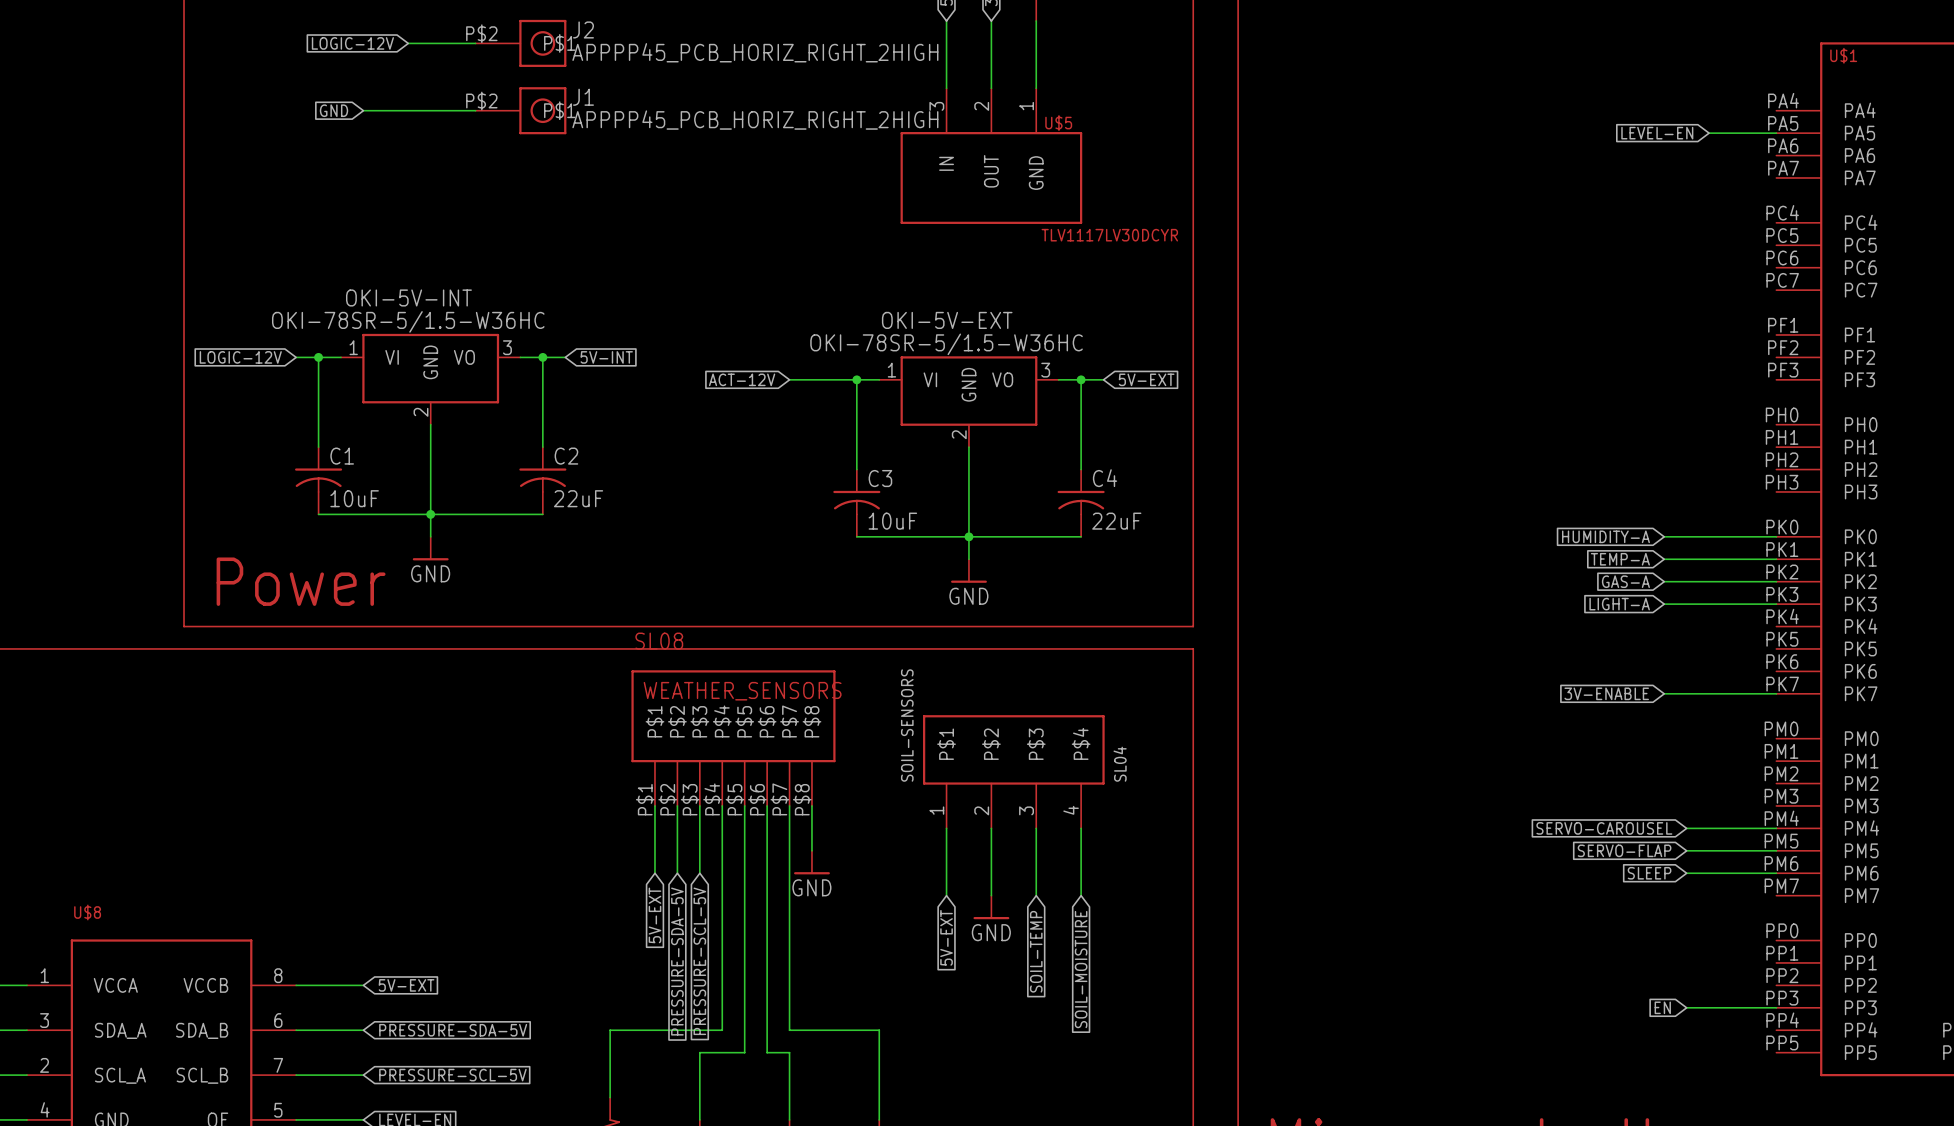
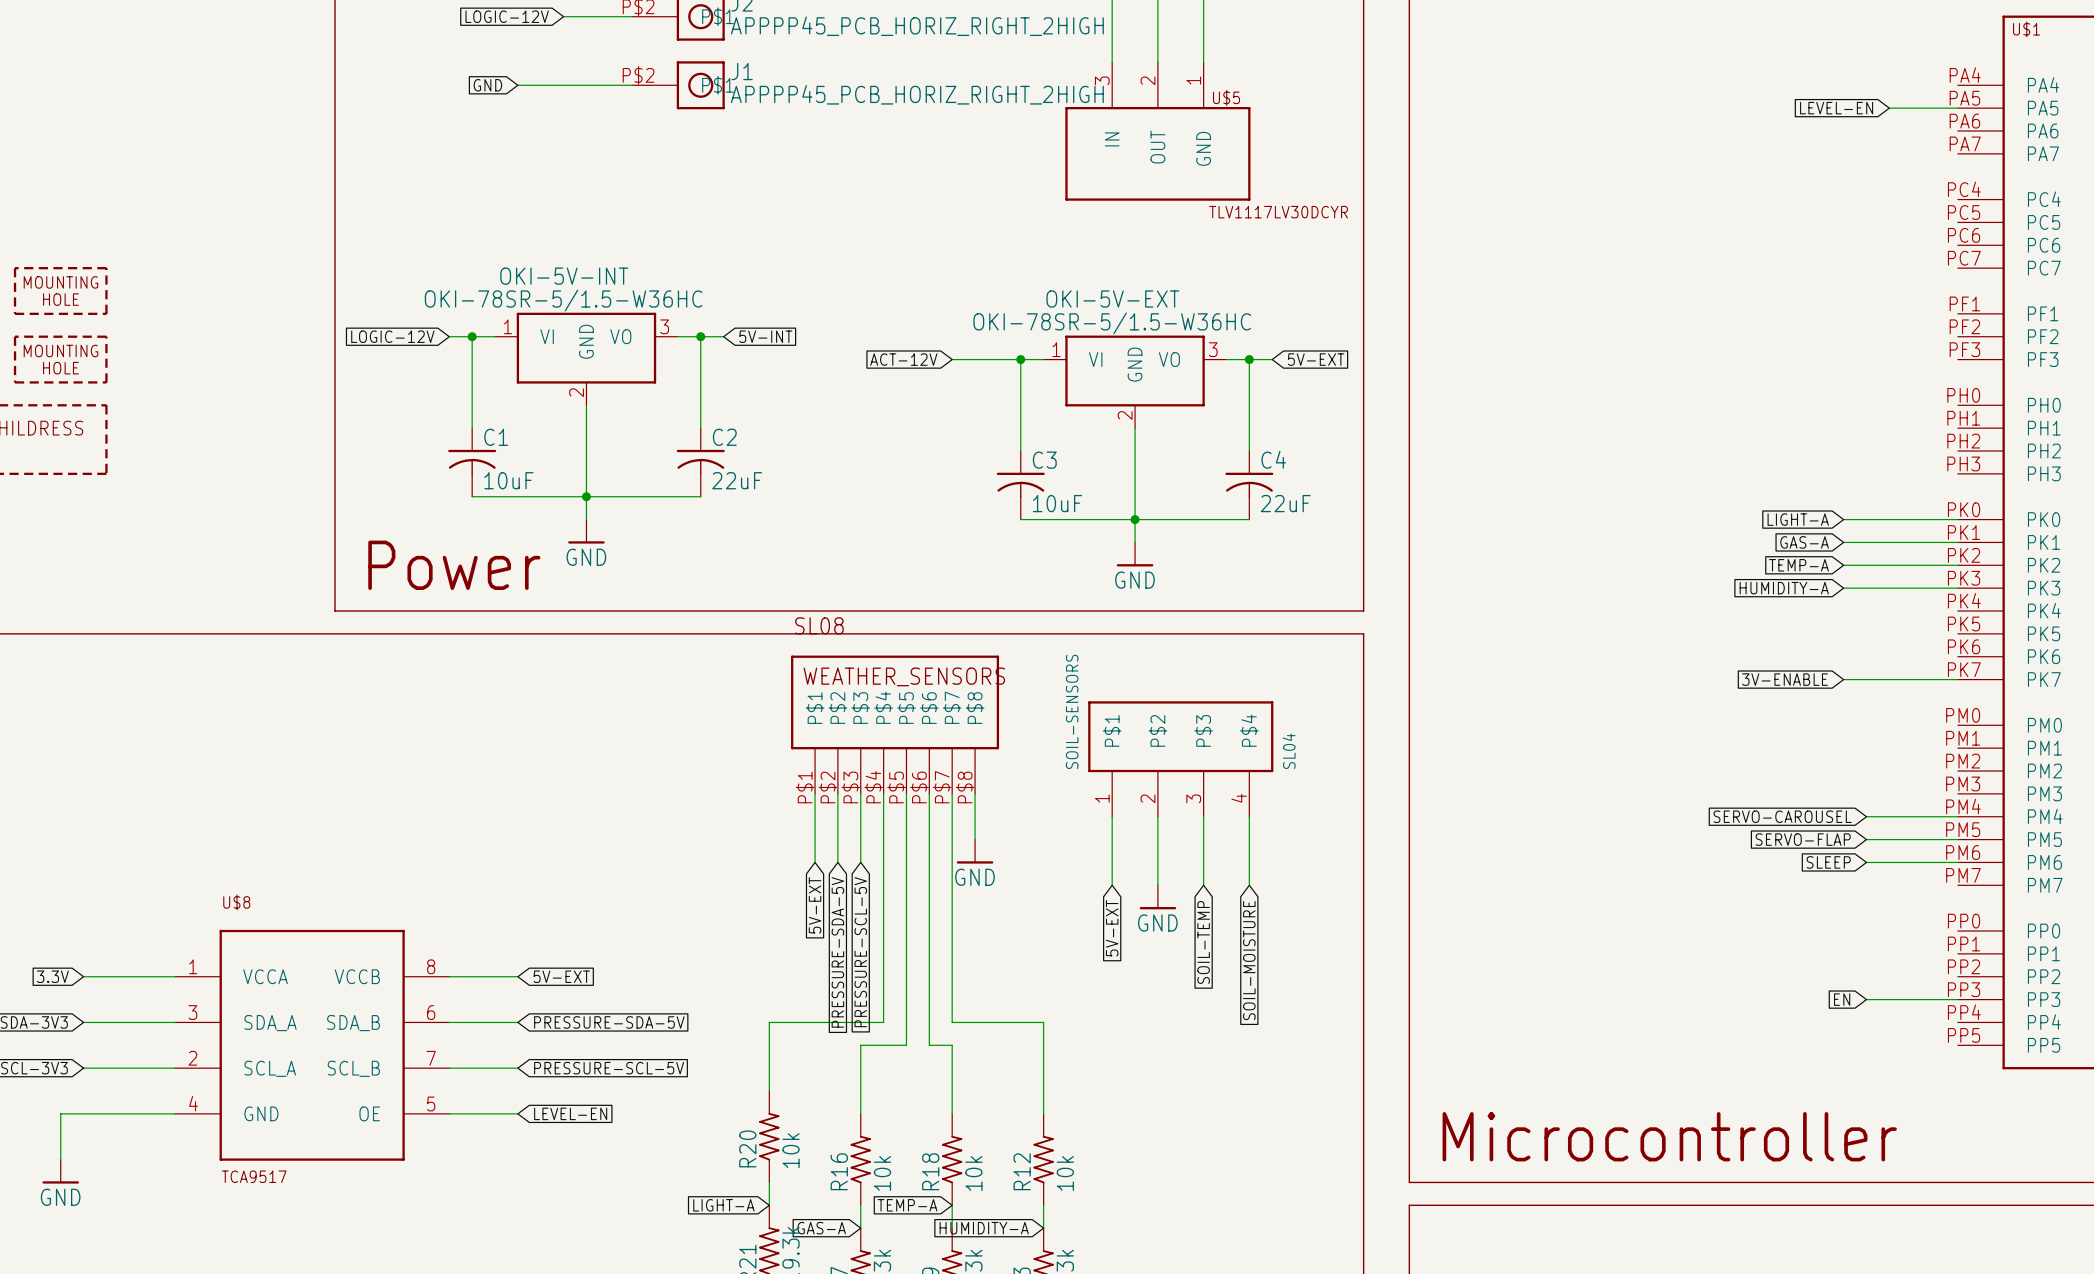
global label: HUMIDITY-A (1605, 536) -> LIGHT-A (1798, 519)
global label: TEMP-A (1620, 559) -> GAS-A (1804, 542)
global label: GAS-A (1625, 581) -> TEMP-A (1798, 565)
global label: LIGHT-A (1619, 604) -> HUMIDITY-A (1784, 588)

